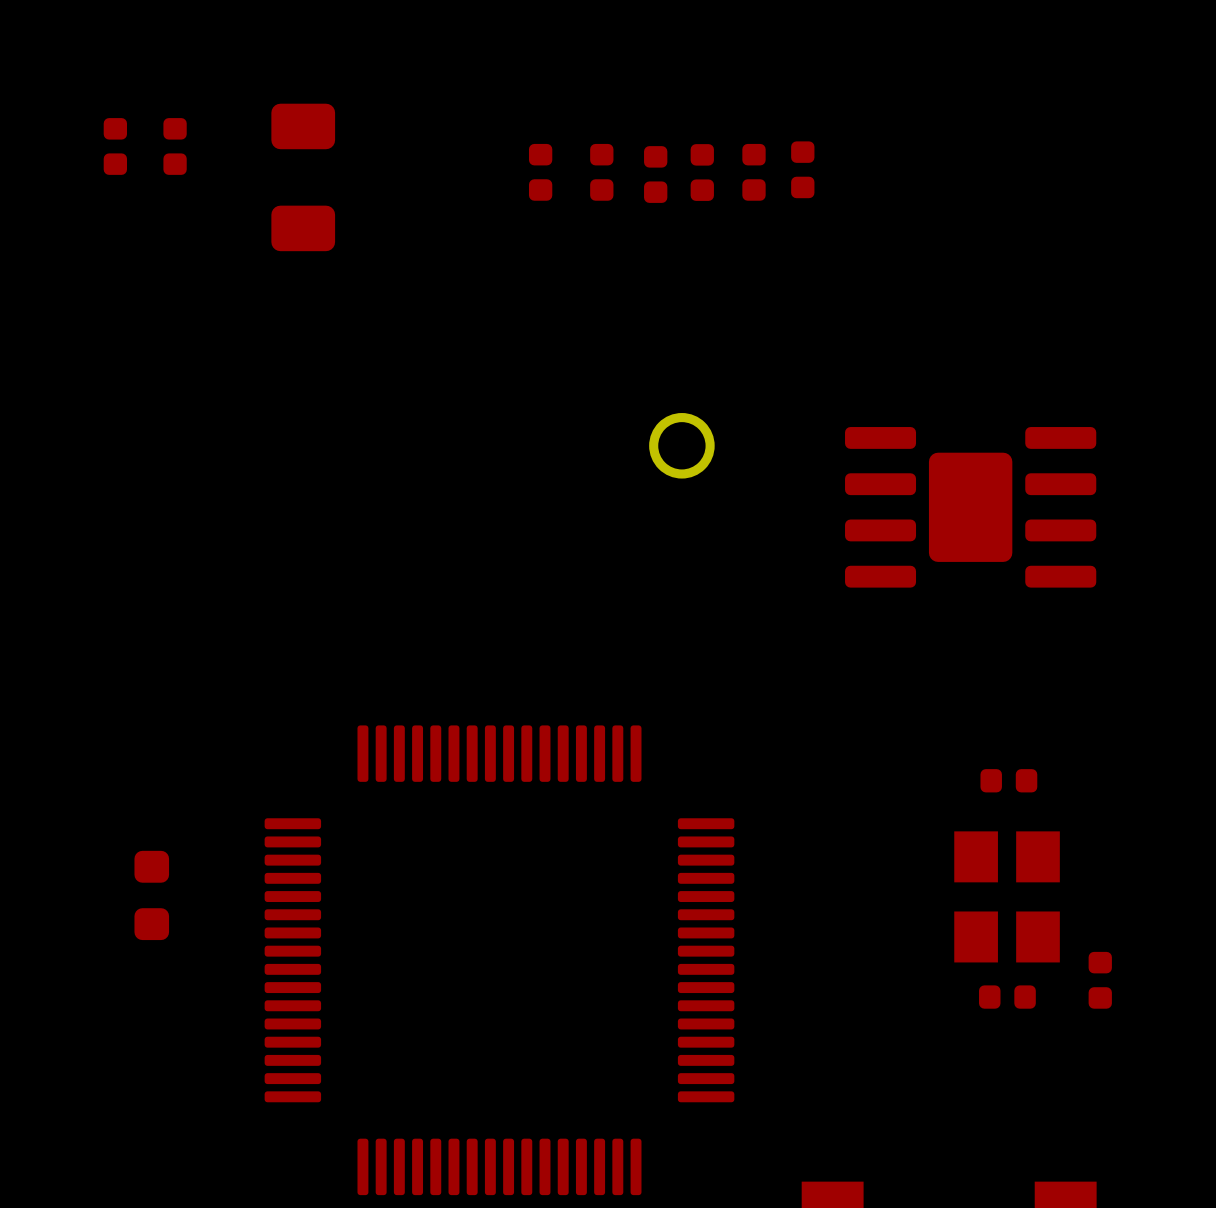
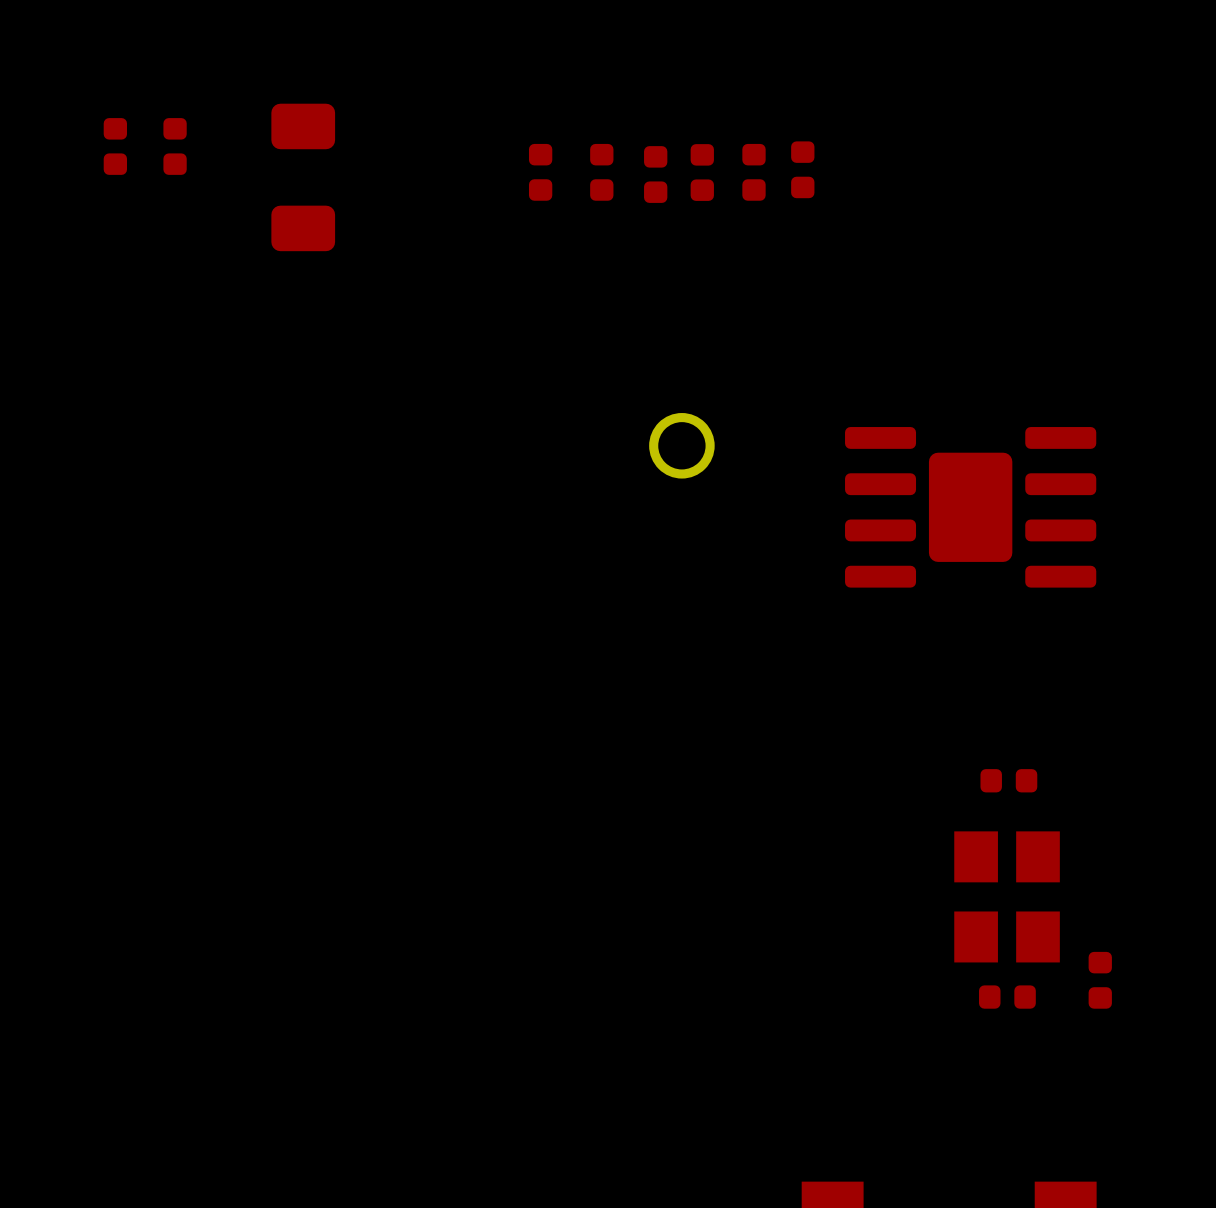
part: (151, 895) -> none
part: (499, 960) -> none

